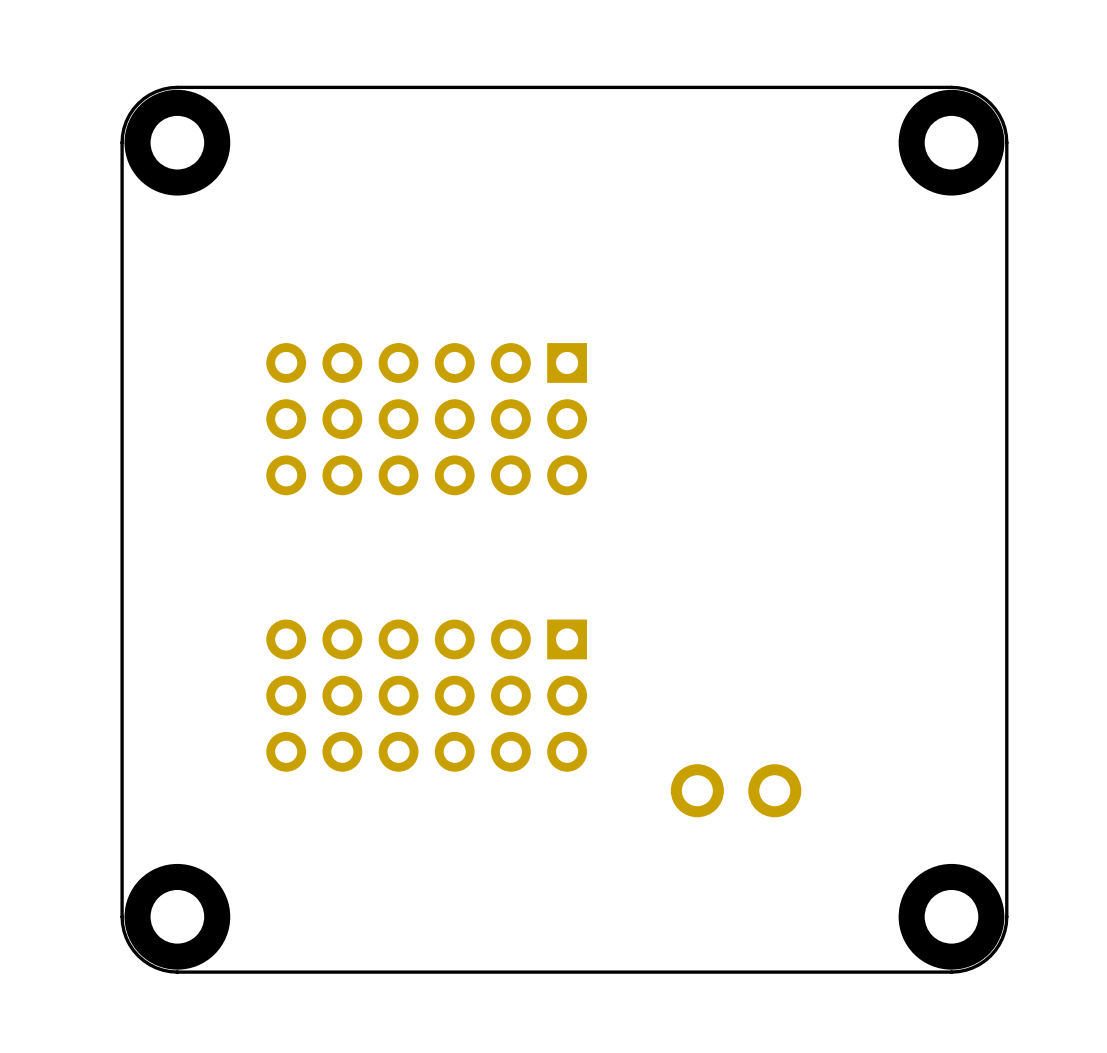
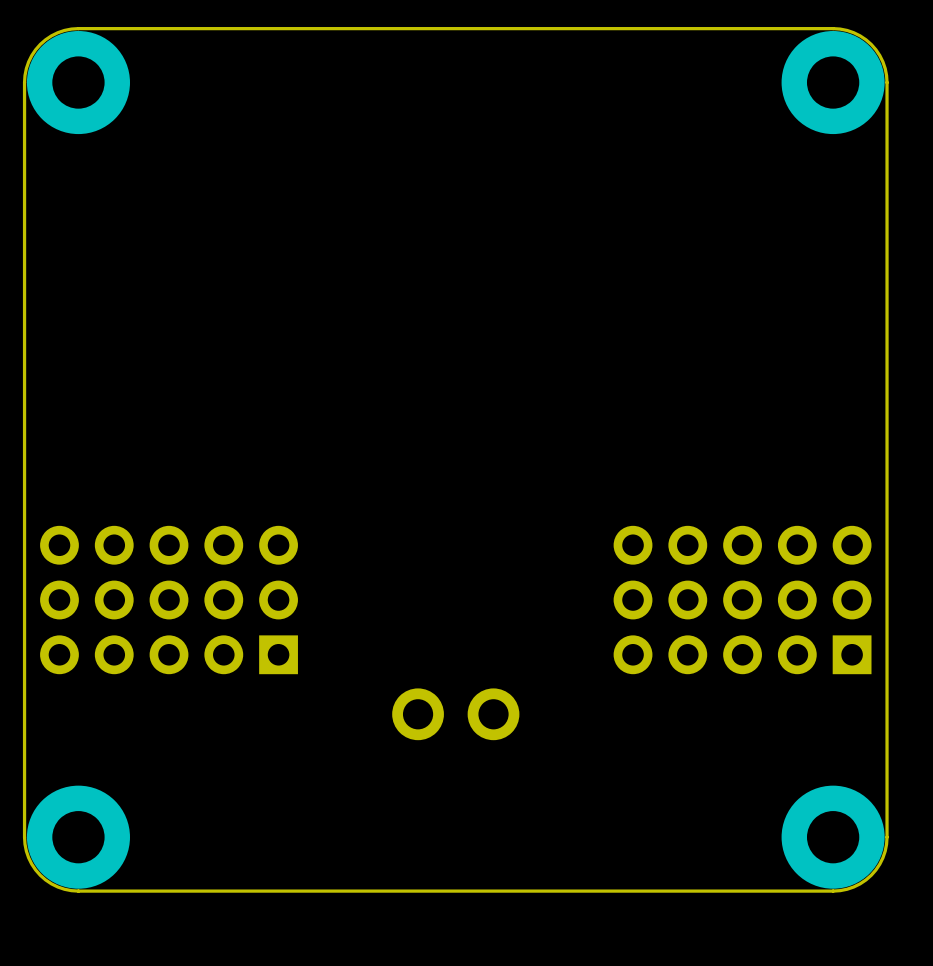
part: (426, 419) -> none
part: none -> (169, 600)
part: none -> (742, 600)
part: (426, 695) -> none
part position: (736, 790) -> (455, 714)

